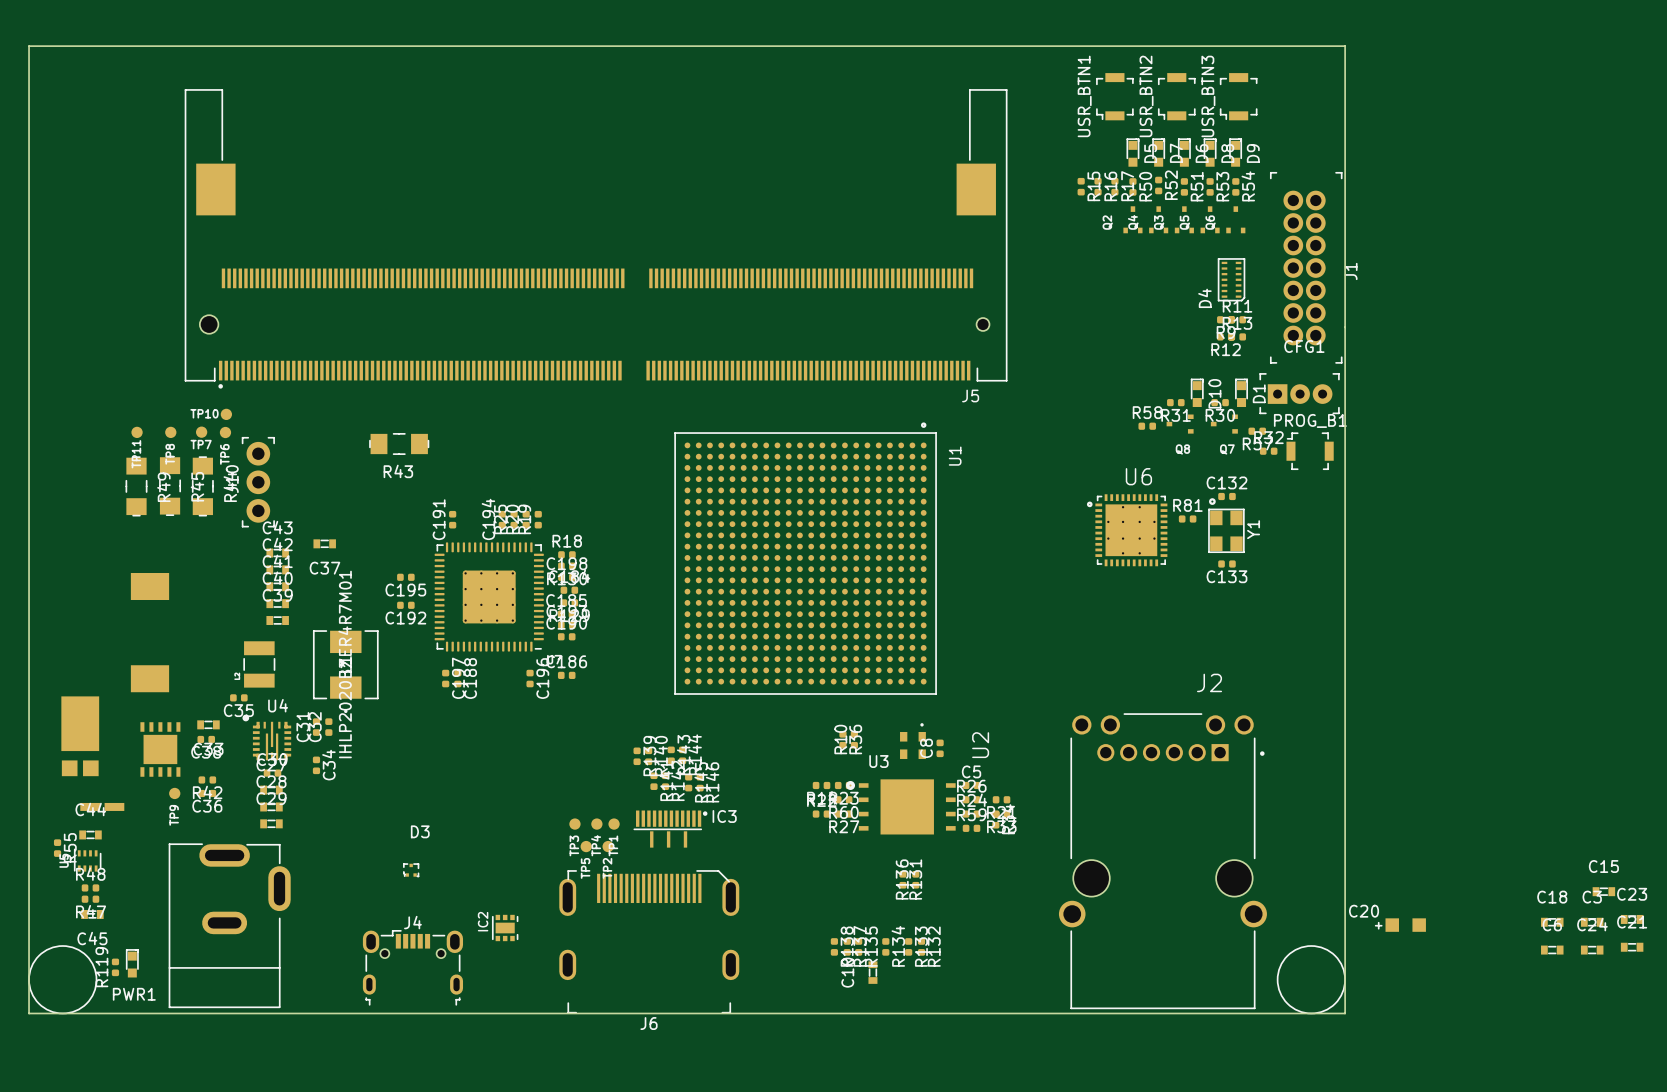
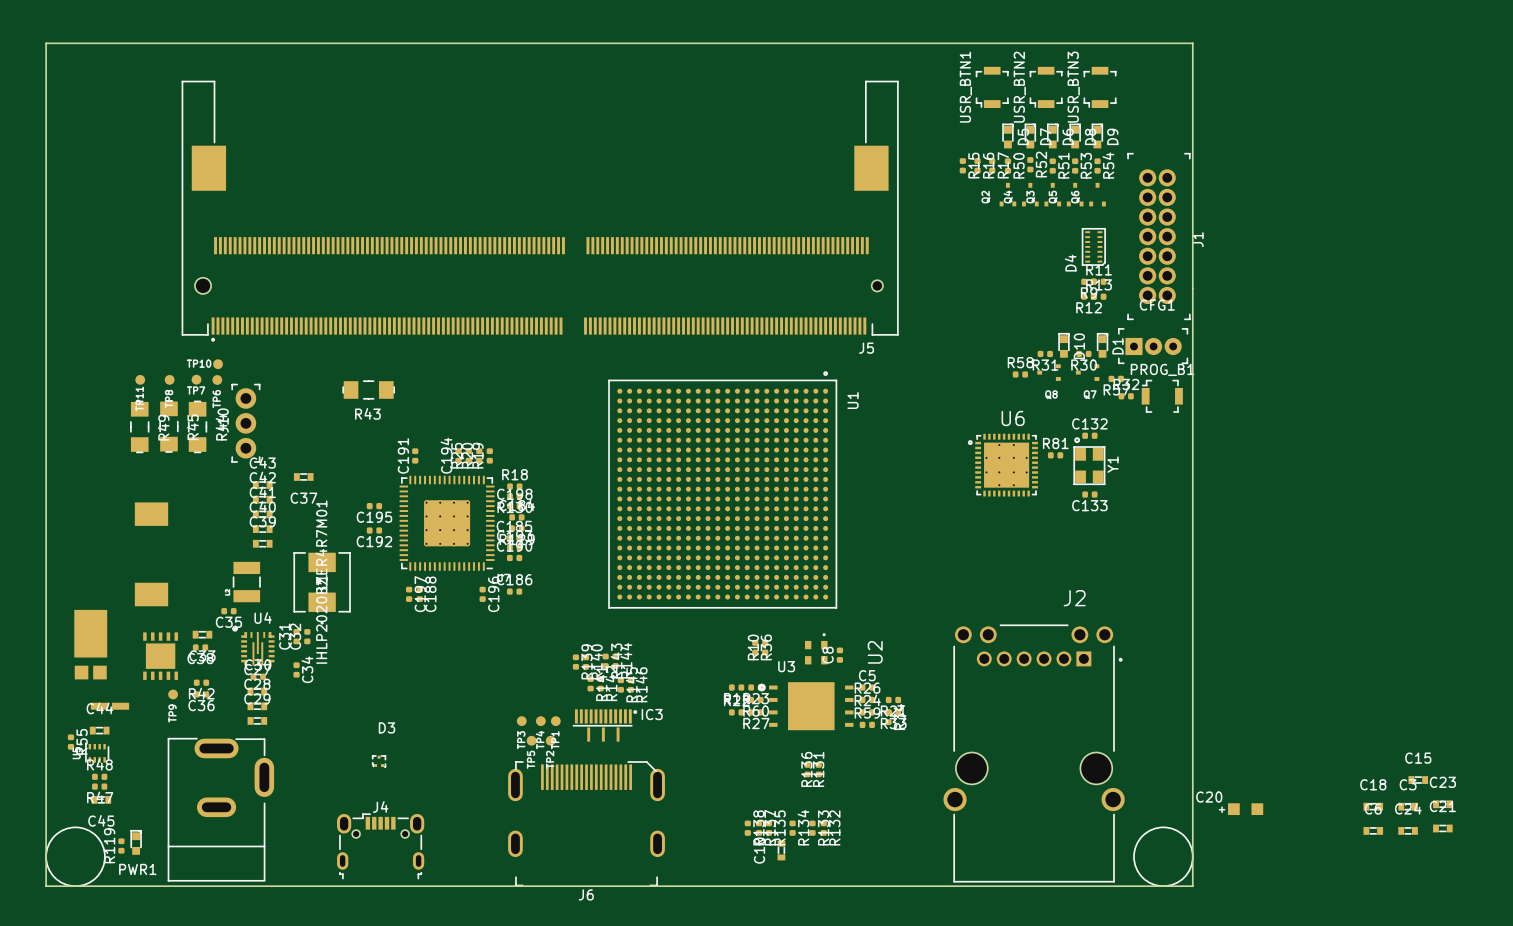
IC2: (505, 928) -> none

